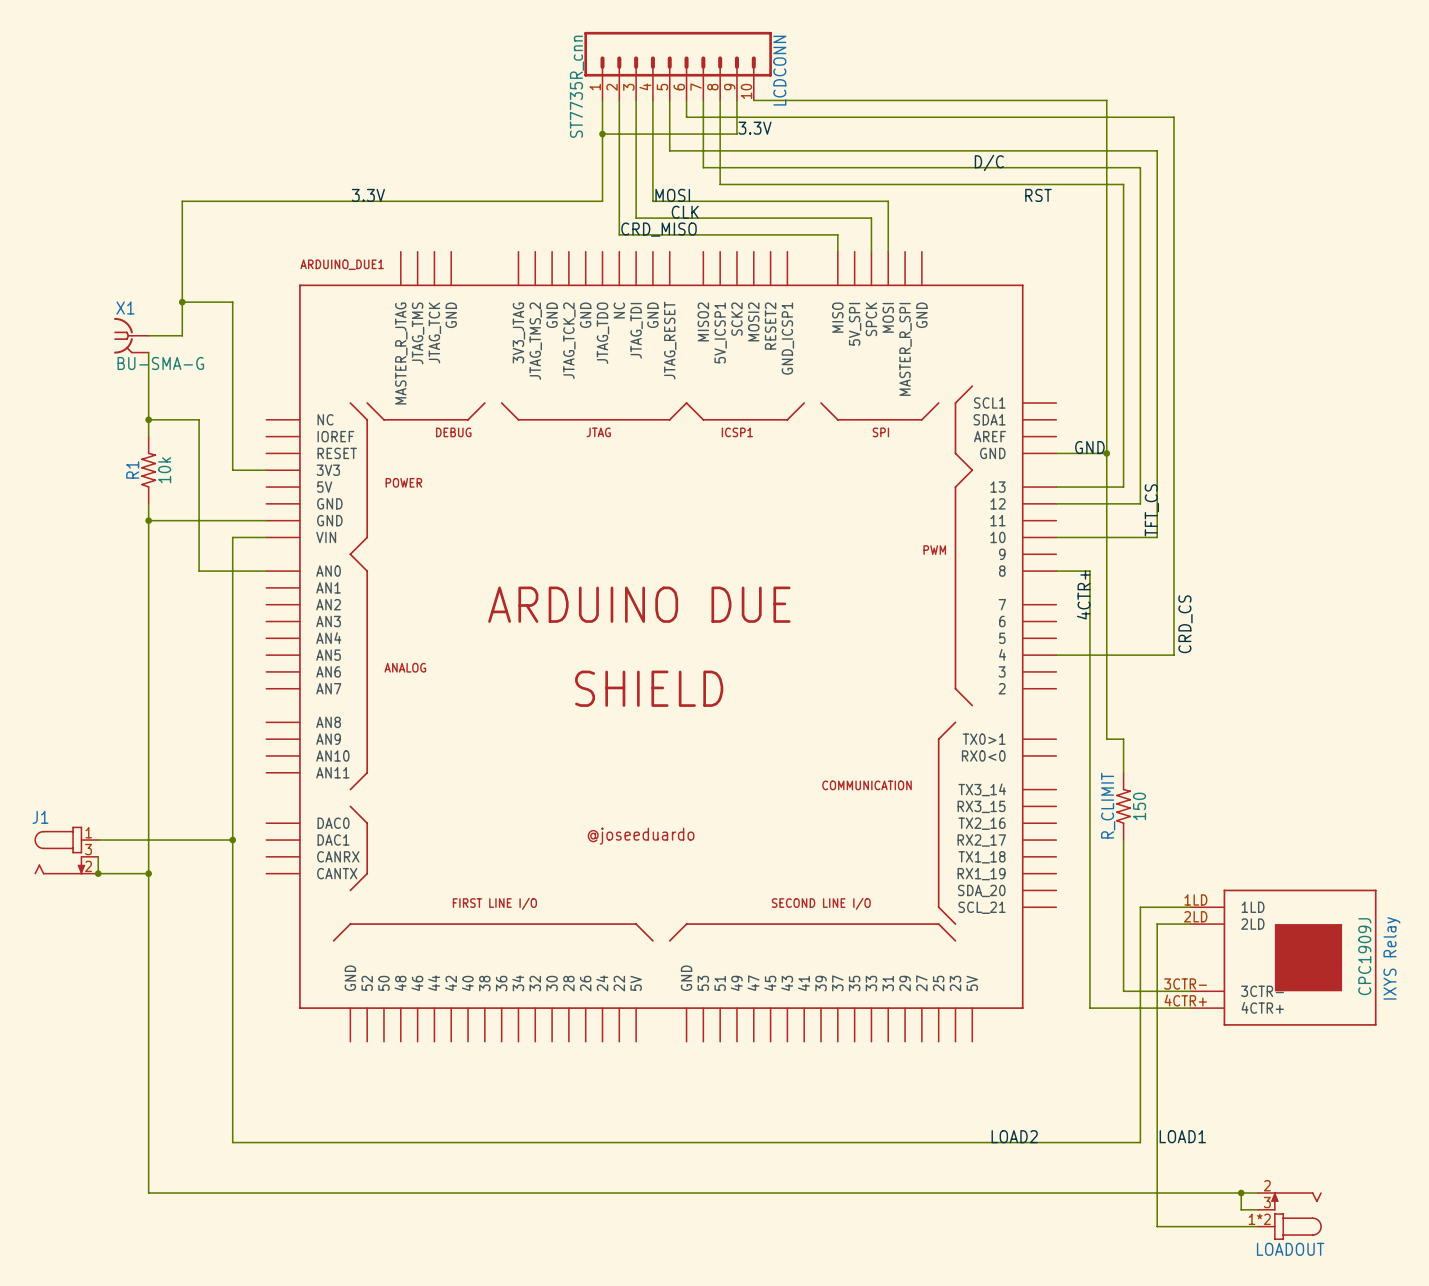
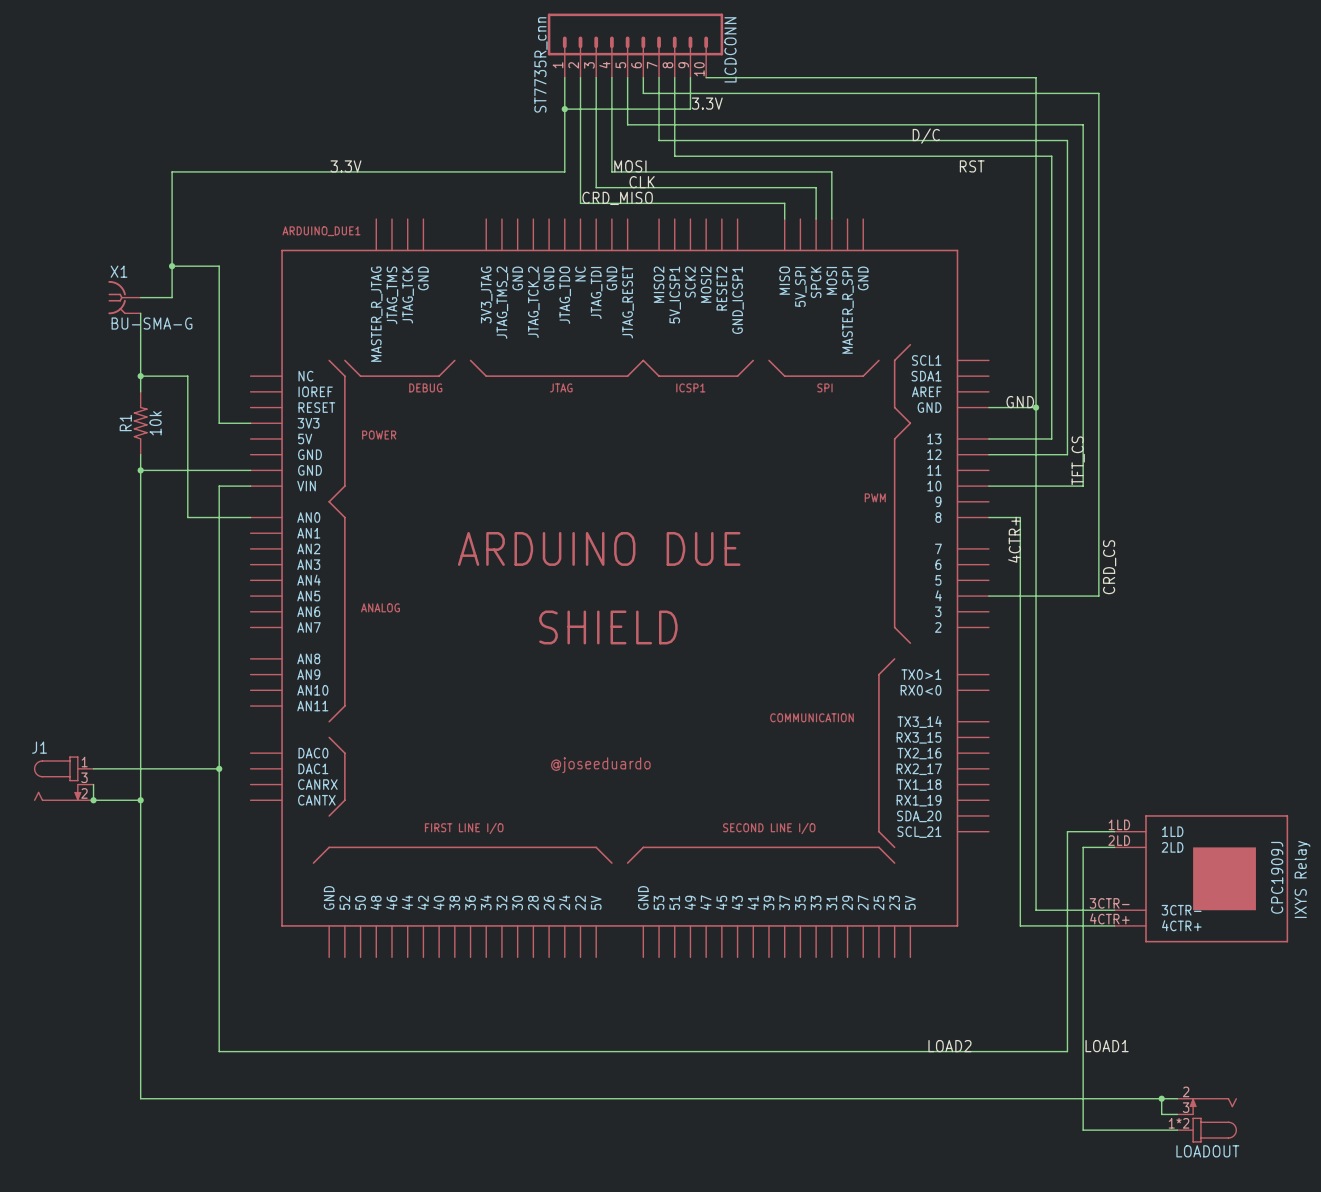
wire: (1106, 739) (1123, 739) (1123, 772) -> none
R_CLIMIT: 150 (1123, 806) -> none
wire: (1123, 840) (1123, 991) -> (1036, 674) (1036, 910) (1051, 910)

